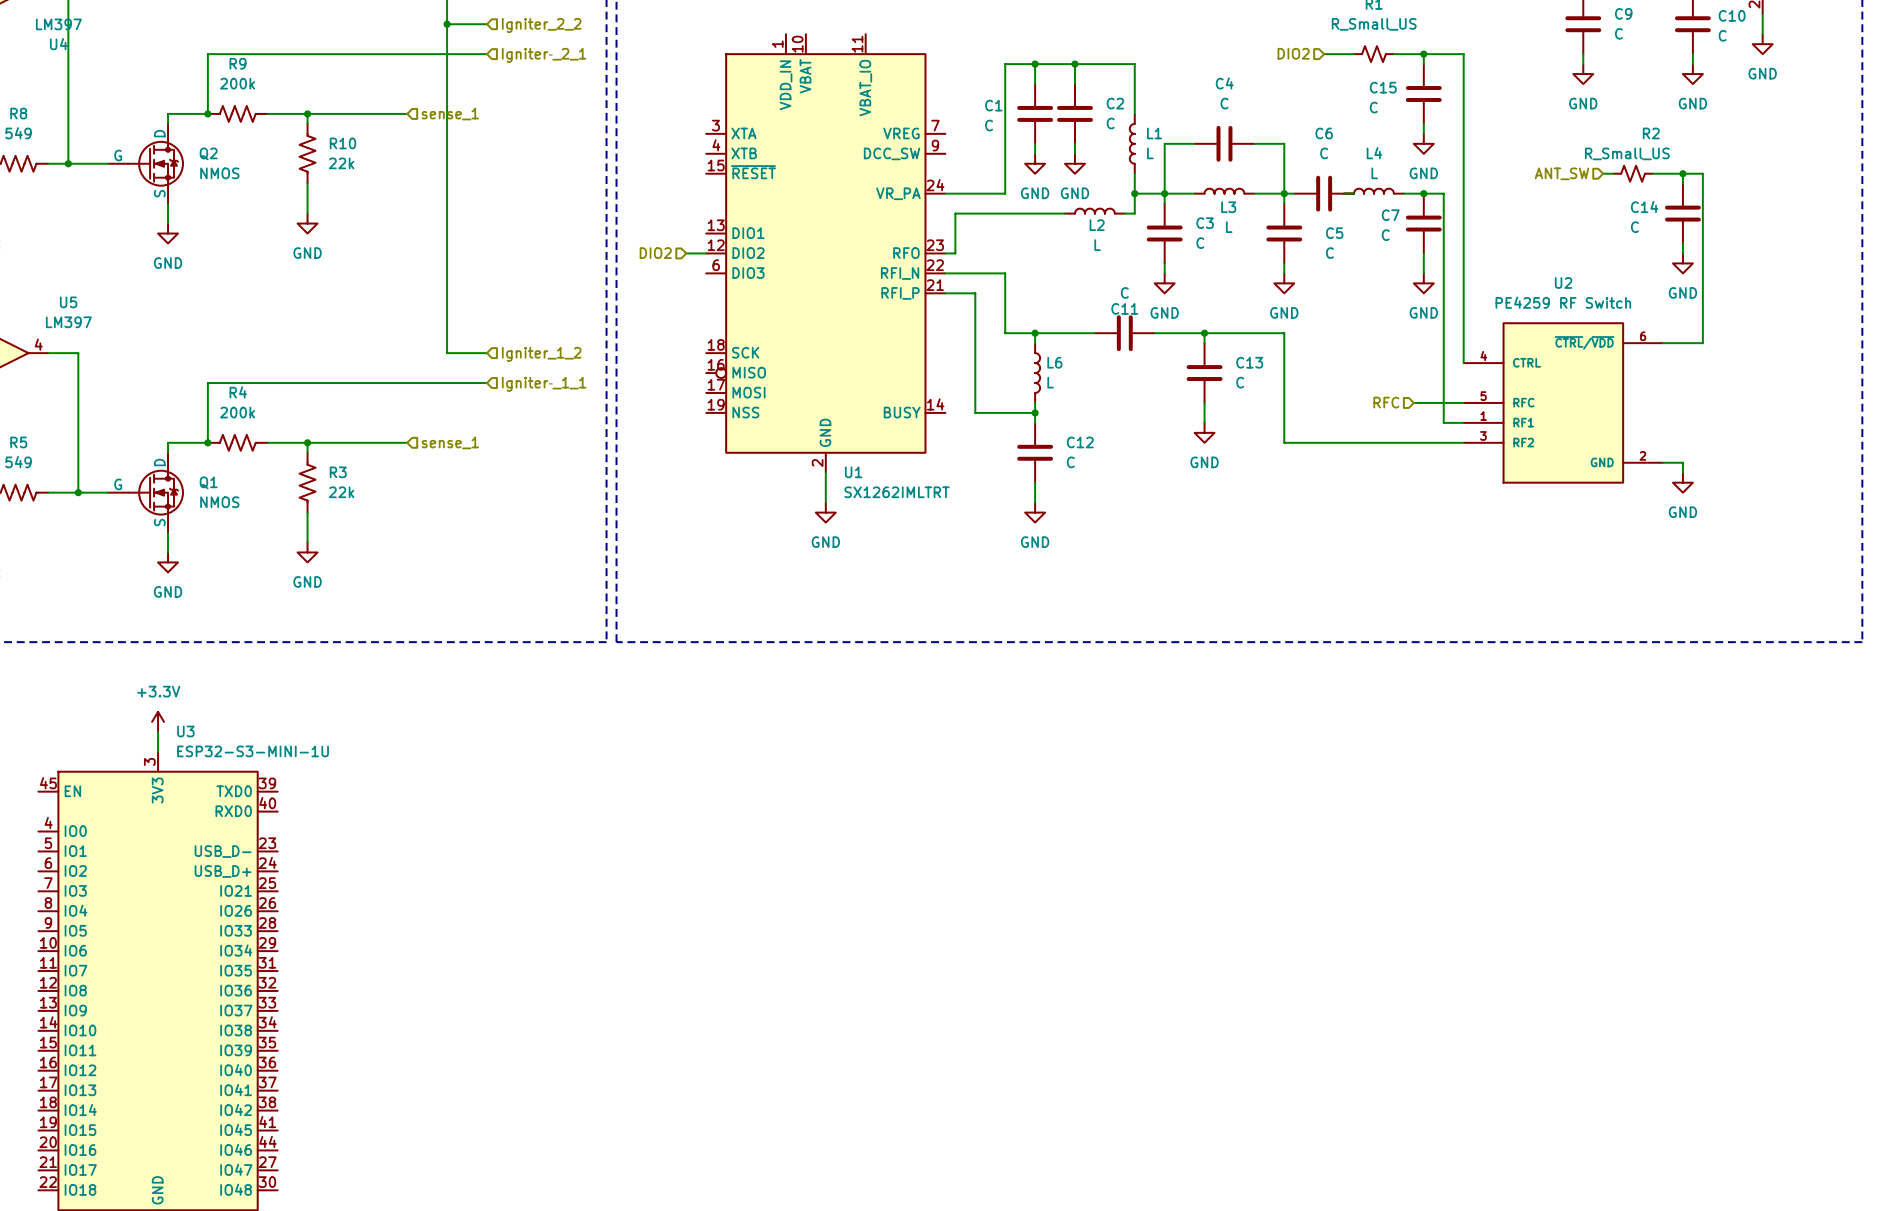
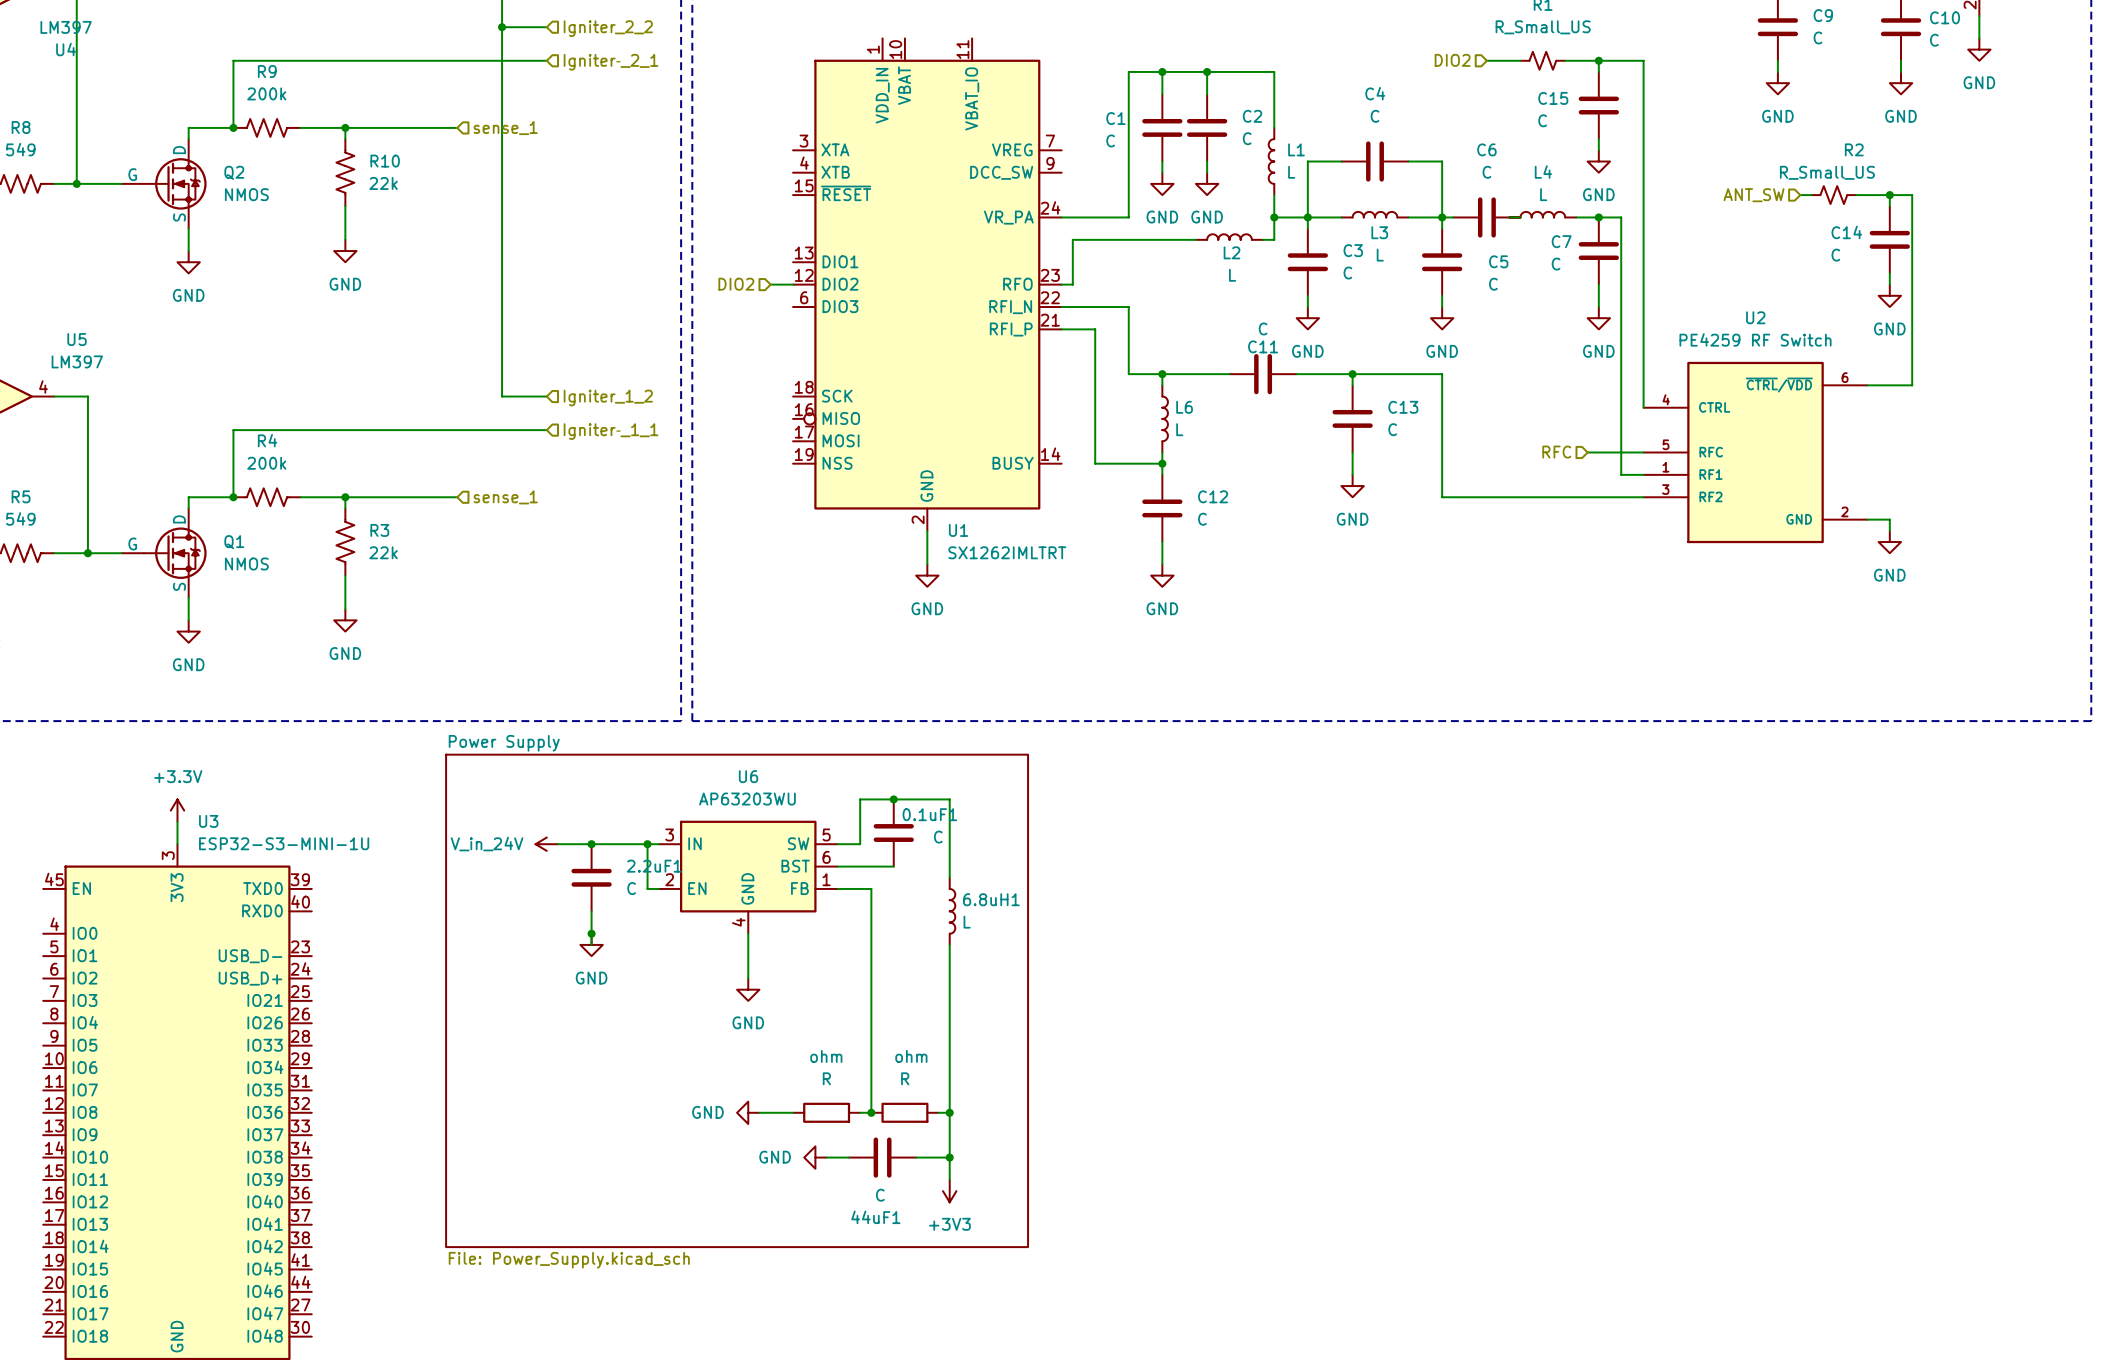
junction: none -> (893, 799)
0.1uF1: none -> C (893, 833)
power symbol: none -> V_in_24V (546, 844)
wire: none -> (558, 844) (658, 844)
junction: none -> (591, 844)
wire: none -> (647, 844) (647, 888) (658, 888)
junction: none -> (647, 844)
wire: none -> (837, 844) (860, 844) (860, 799) (949, 799) (949, 877)
wire: none -> (837, 866) (893, 866)
2.2uF1: none -> C (591, 877)
U6: none -> AP63203WU (748, 877)
wire: none -> (837, 888) (871, 888) (871, 1112) (860, 1112)
wire: none -> (591, 911) (591, 944)
6.8uH1: none -> L (952, 911)
junction: none -> (591, 933)
wire: none -> (748, 933) (748, 978)
power symbol: none -> GND (591, 944)
wire: none -> (949, 944) (949, 1179)
power symbol: none -> GND (748, 989)
sheet Power Supply: none -> File: Power_Supply.kicad_sch (737, 1000)
power symbol: none -> GND (748, 1112)
wire: none -> (759, 1112) (793, 1112)
ohm: none -> R (826, 1112)
junction: none -> (871, 1112)
ohm: none -> R (904, 1112)
wire: none -> (938, 1112) (949, 1112)
junction: none -> (949, 1112)
power symbol: none -> GND (815, 1157)
wire: none -> (826, 1157) (848, 1157)
44uF1: none -> C (882, 1157)
wire: none -> (916, 1157) (949, 1157)
junction: none -> (949, 1157)
power symbol: none -> +3V3 (949, 1191)

